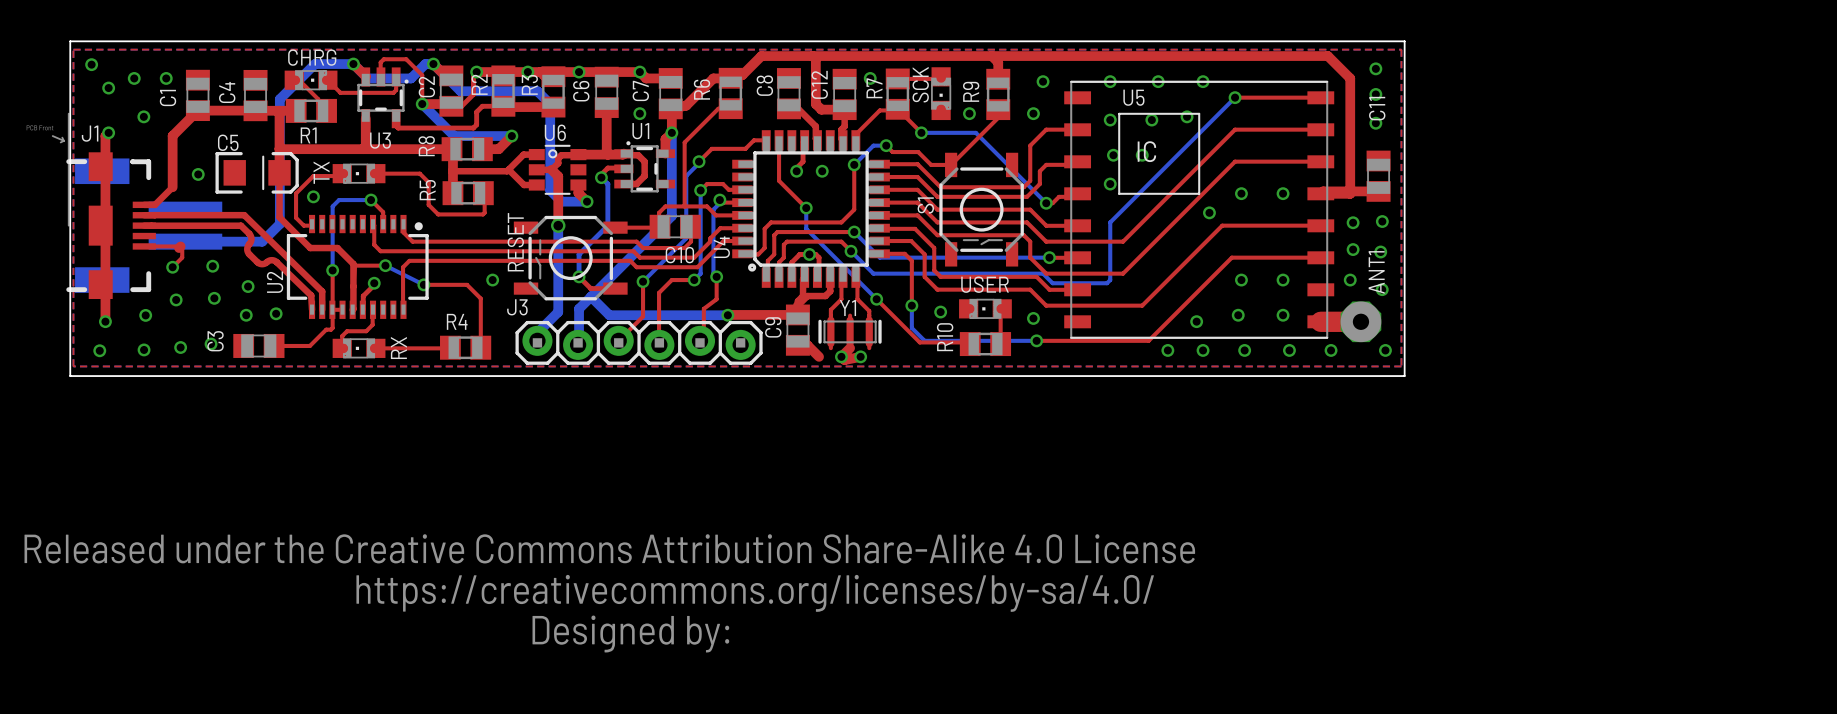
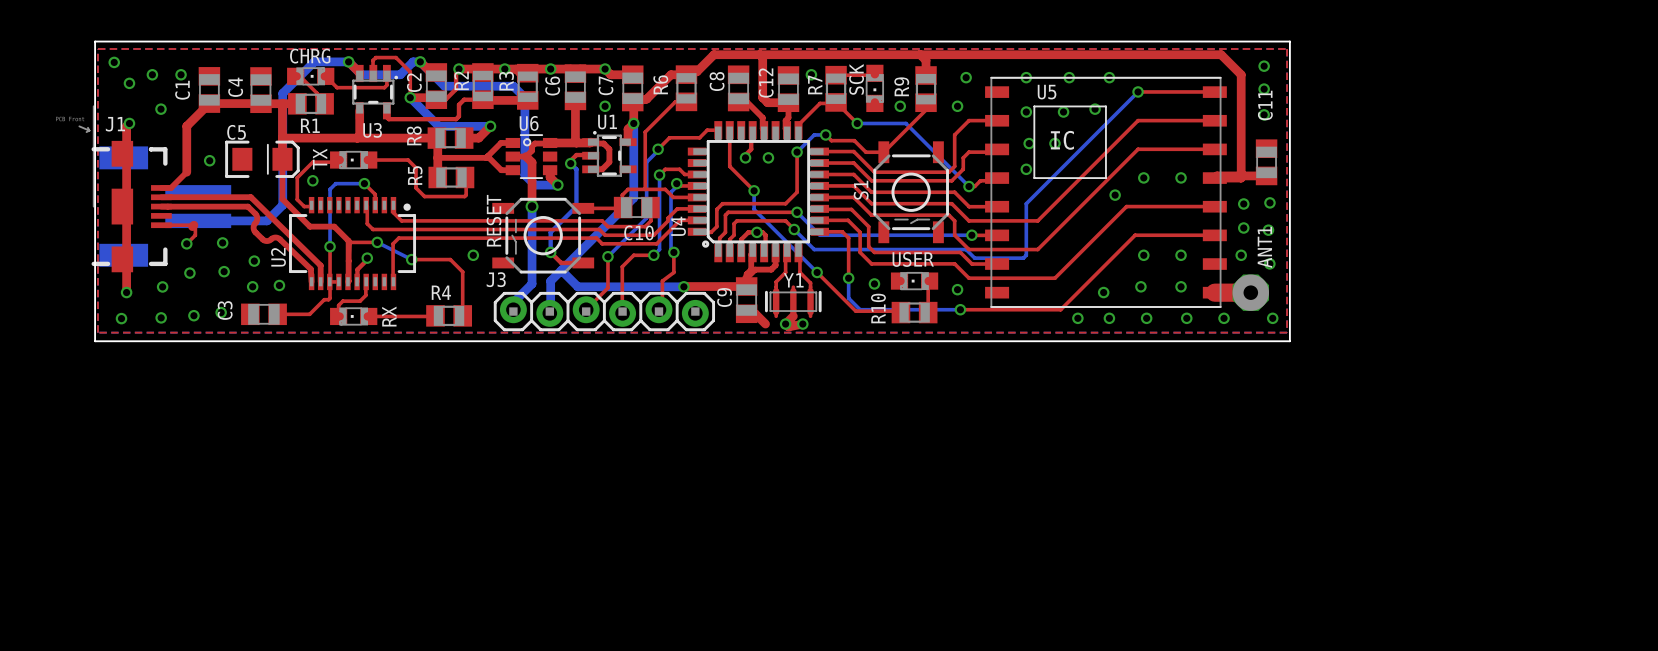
drawing: [24, 534, 1196, 653] -> none

